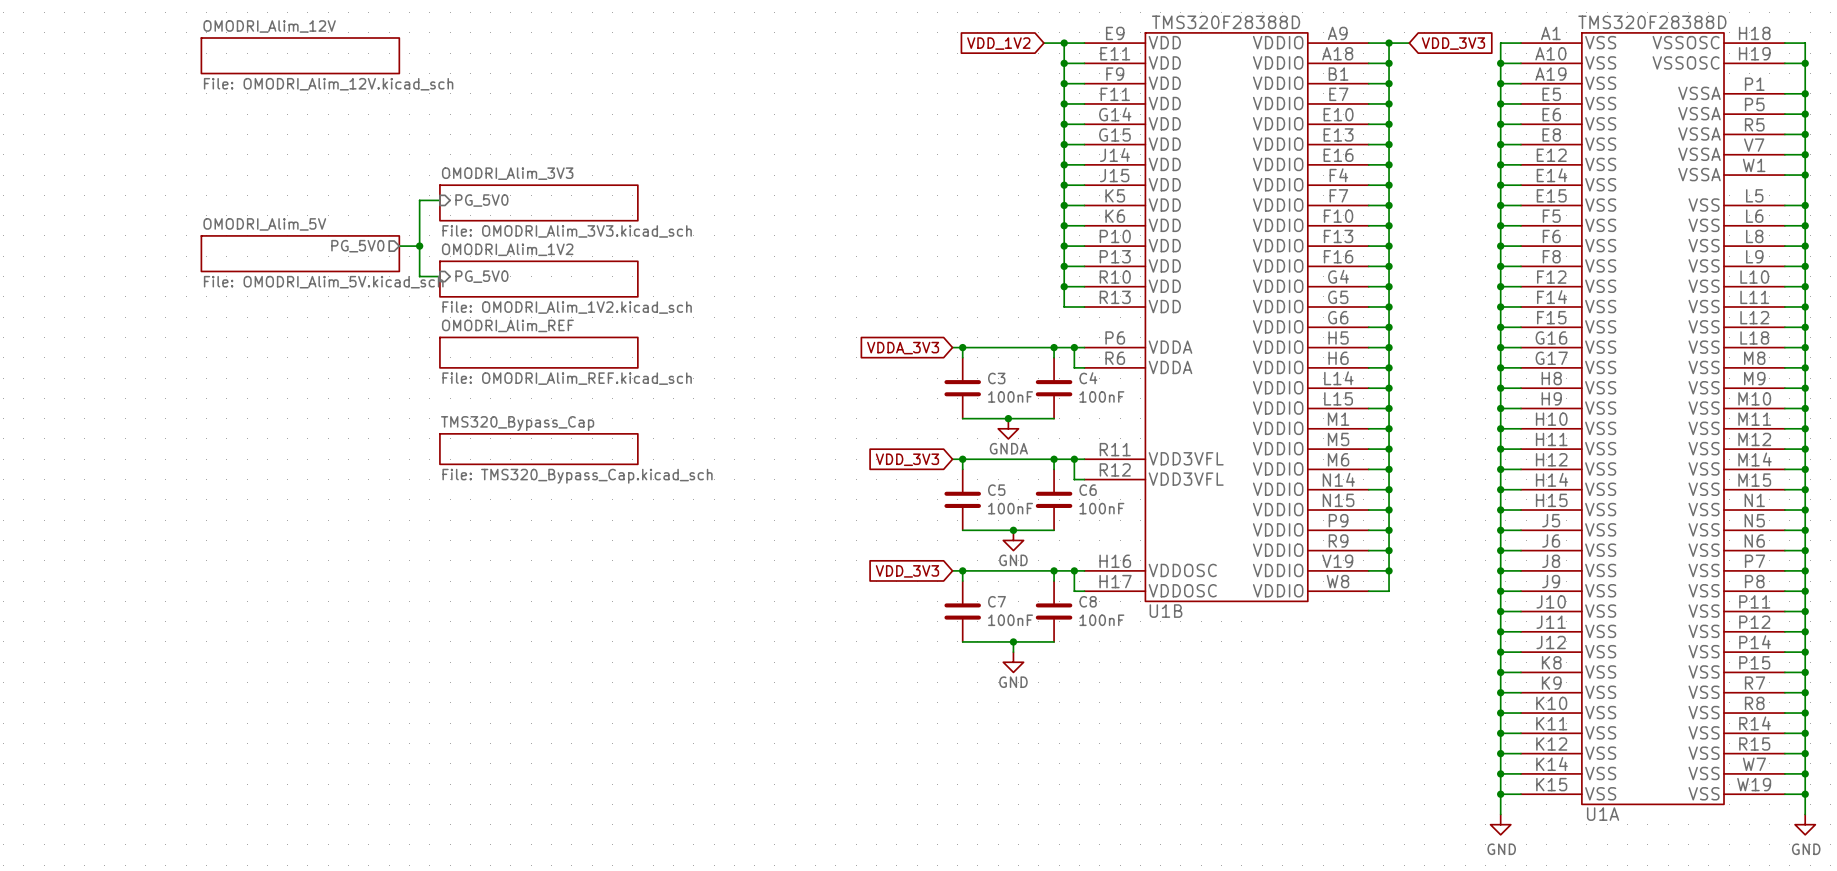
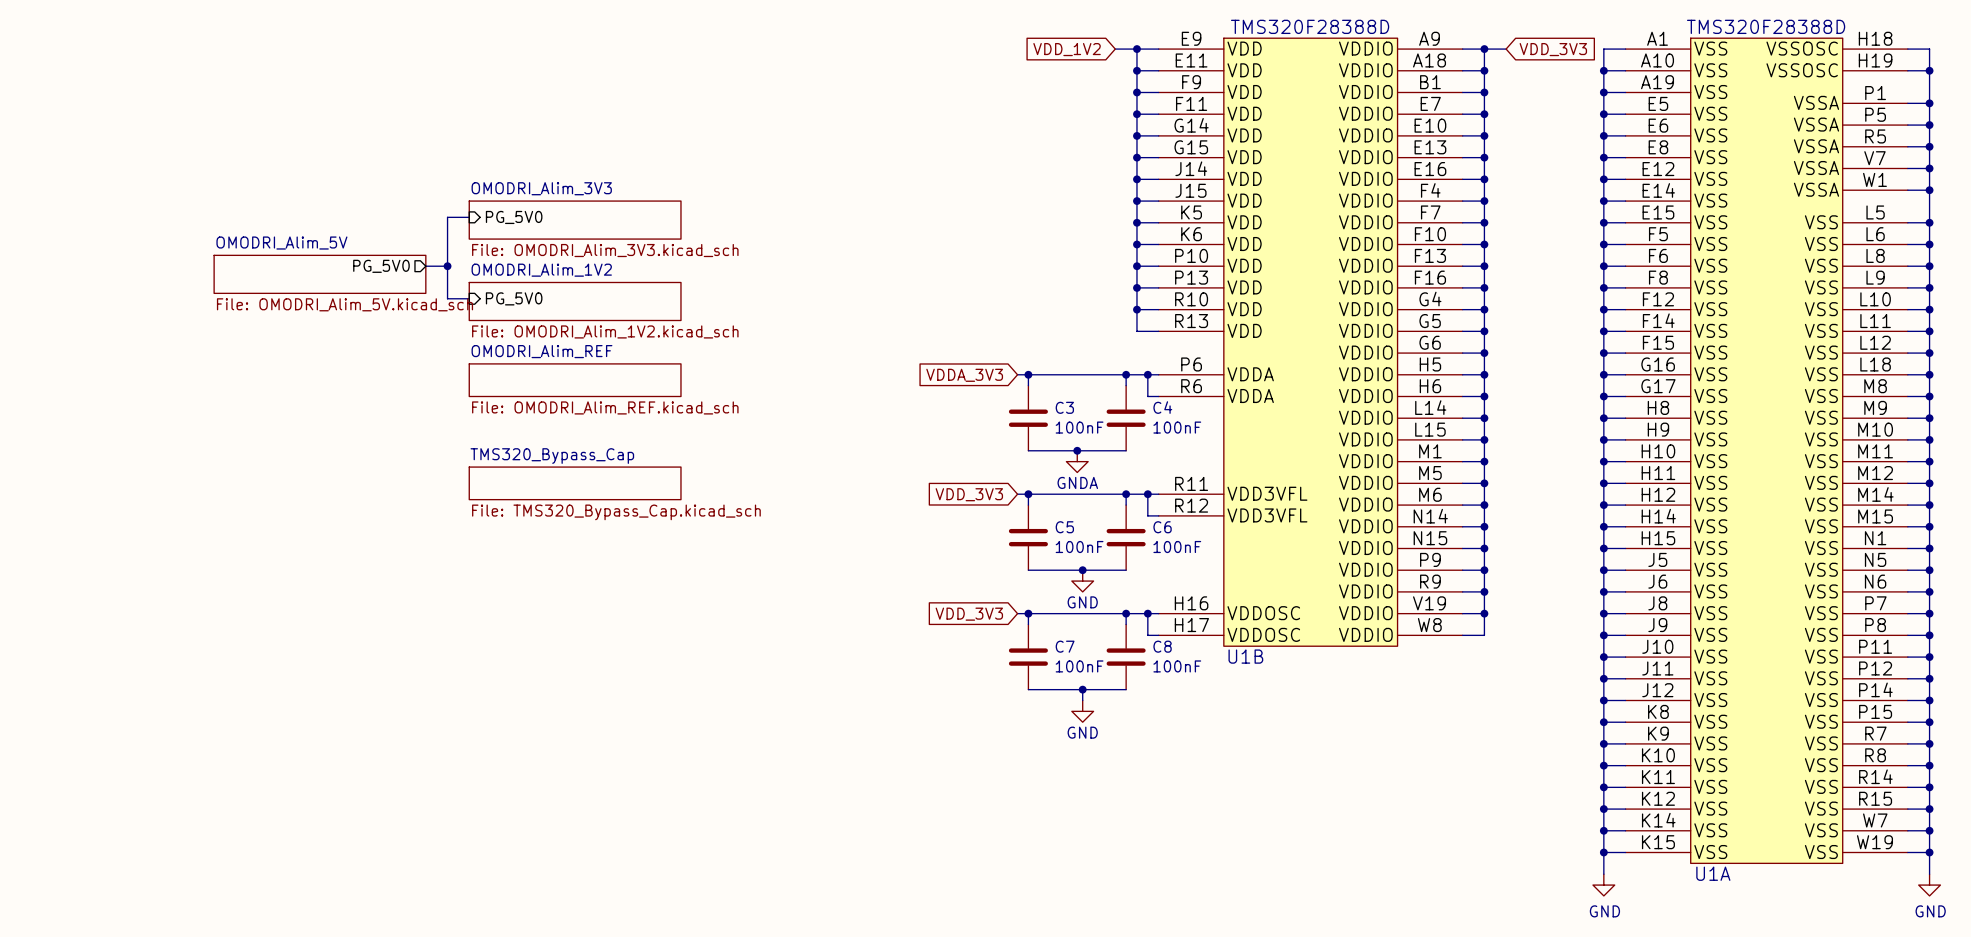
sheet OMODRI_Alim_12V: File: OMODRI_Alim_12V.kicad_sch (300, 55) -> none

